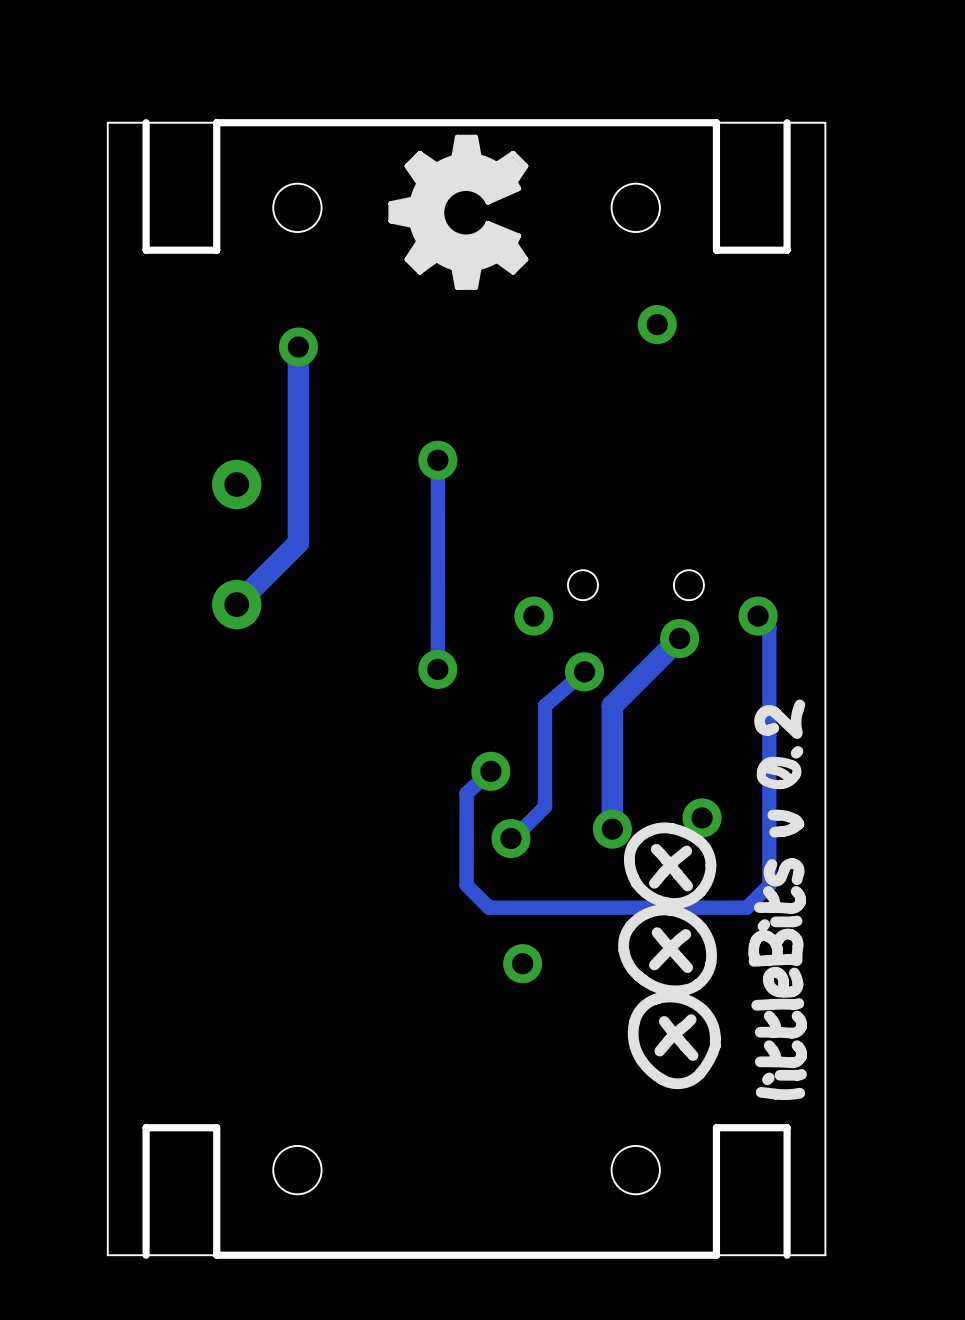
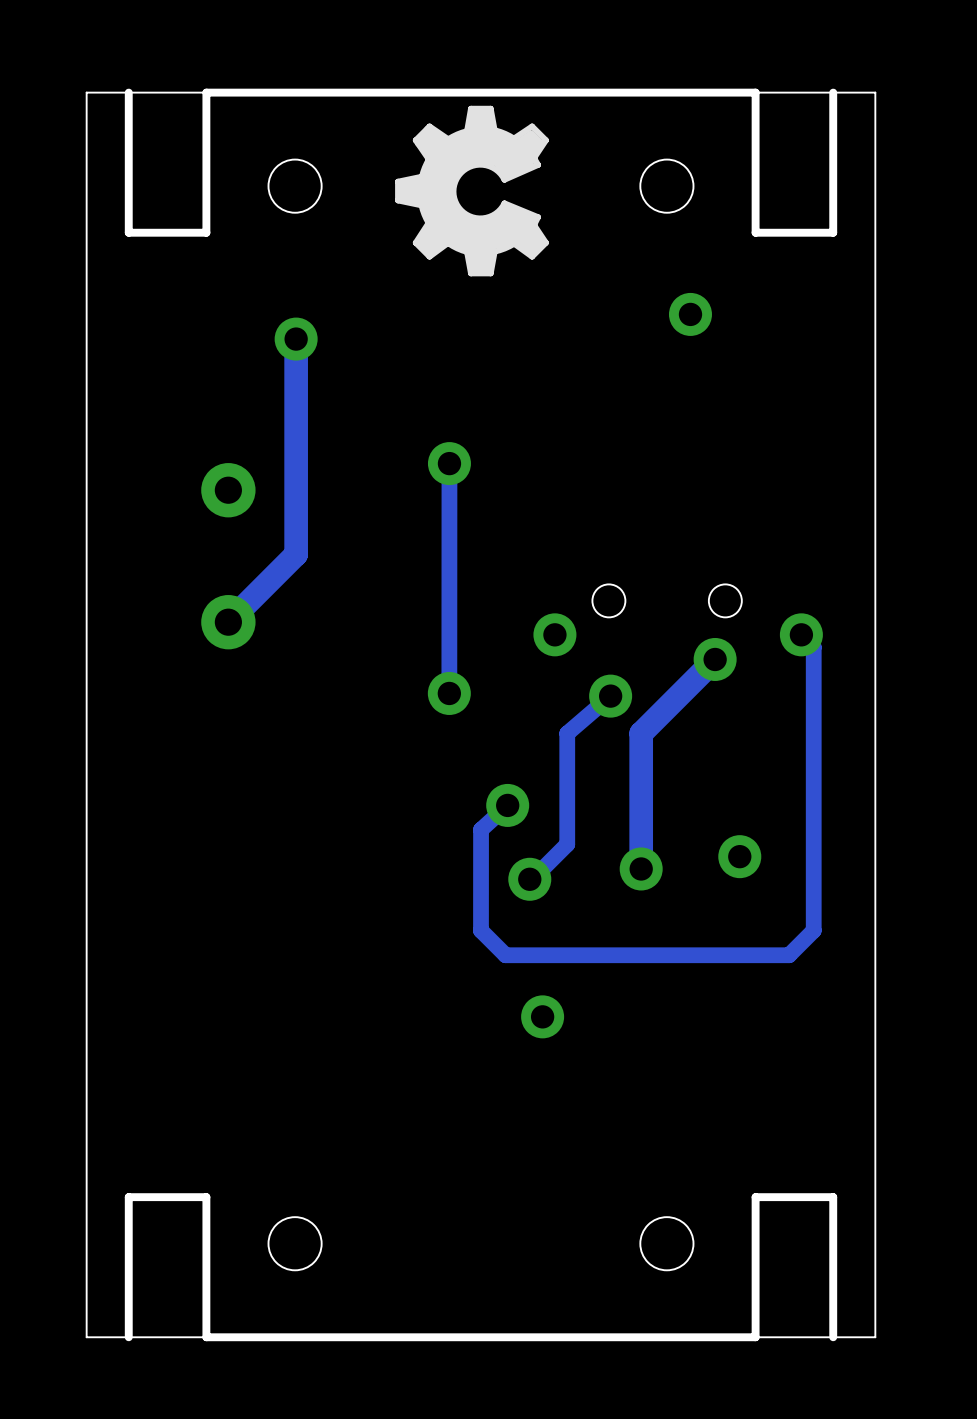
drawing: [618, 699, 807, 1101] -> none

